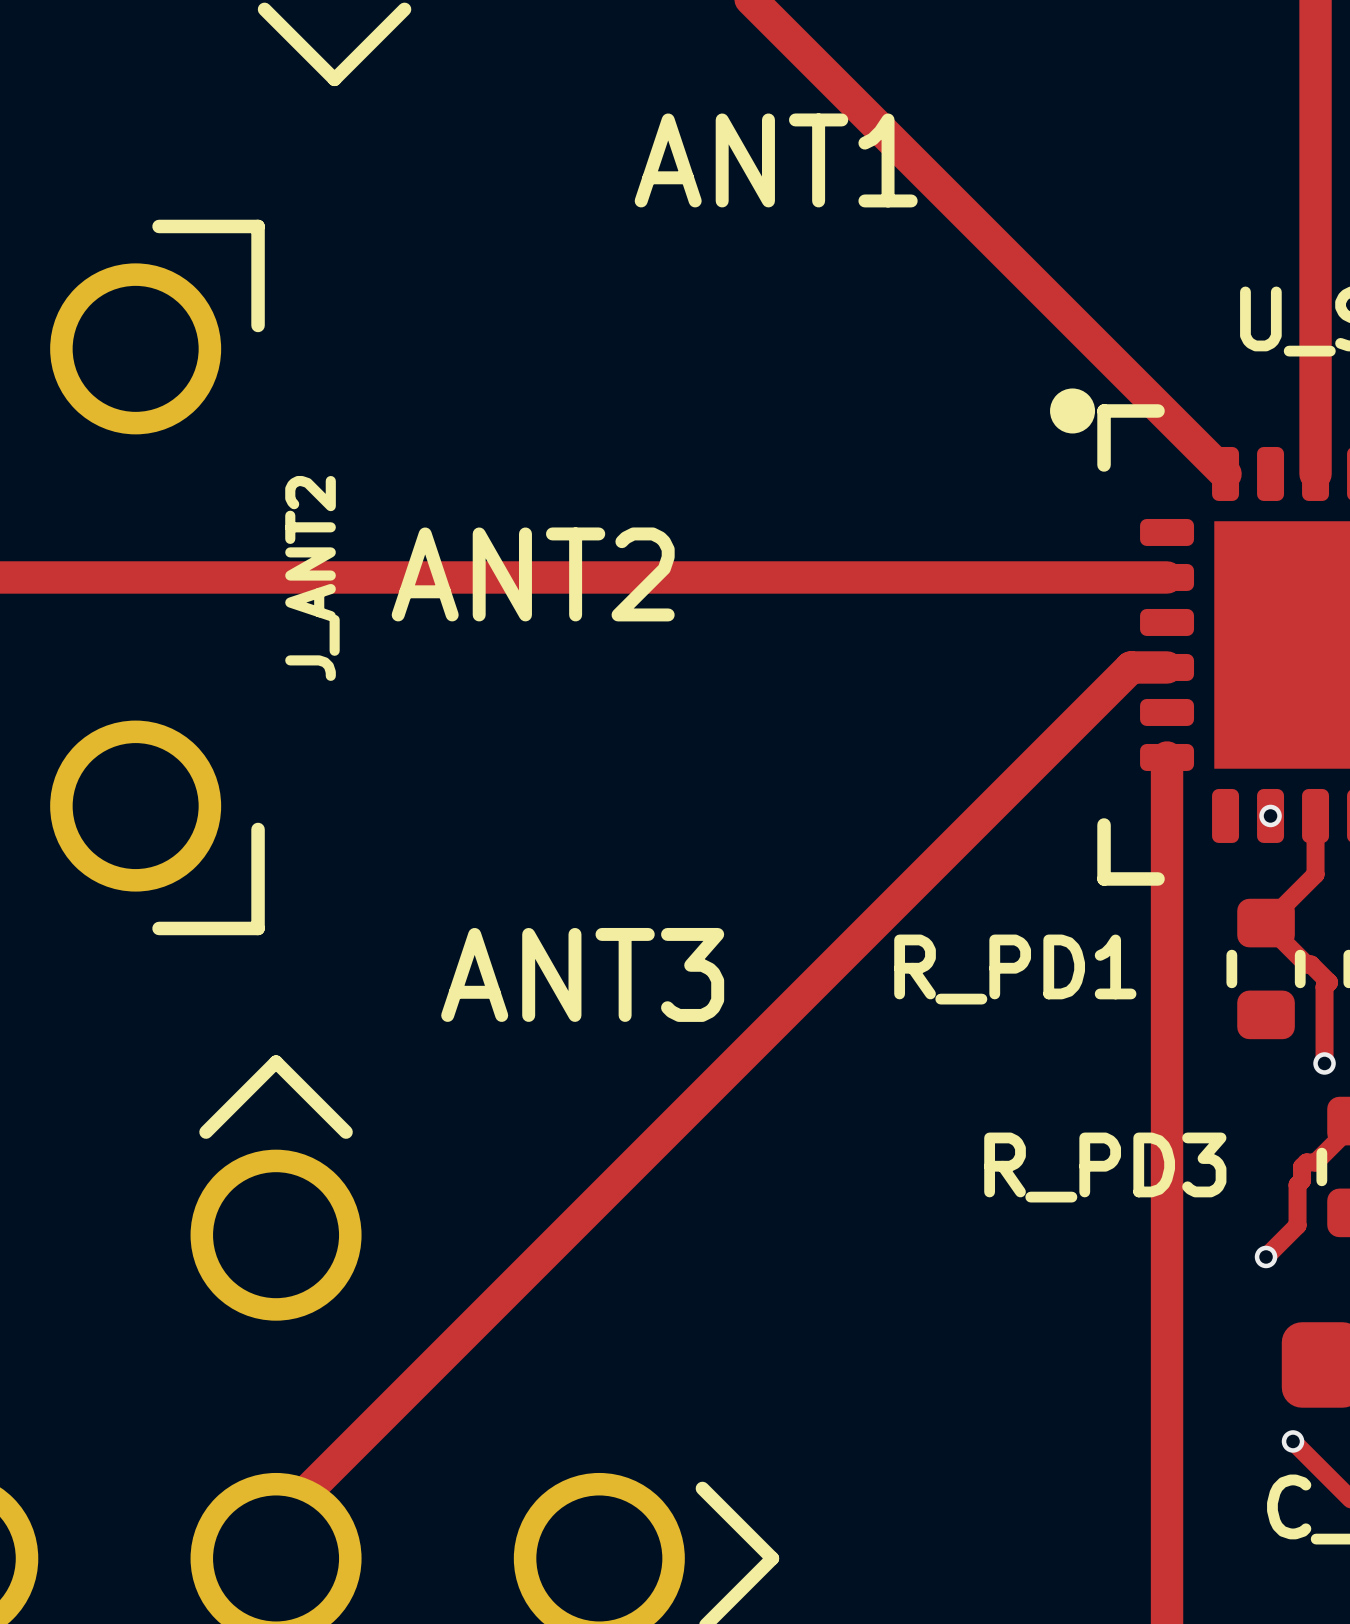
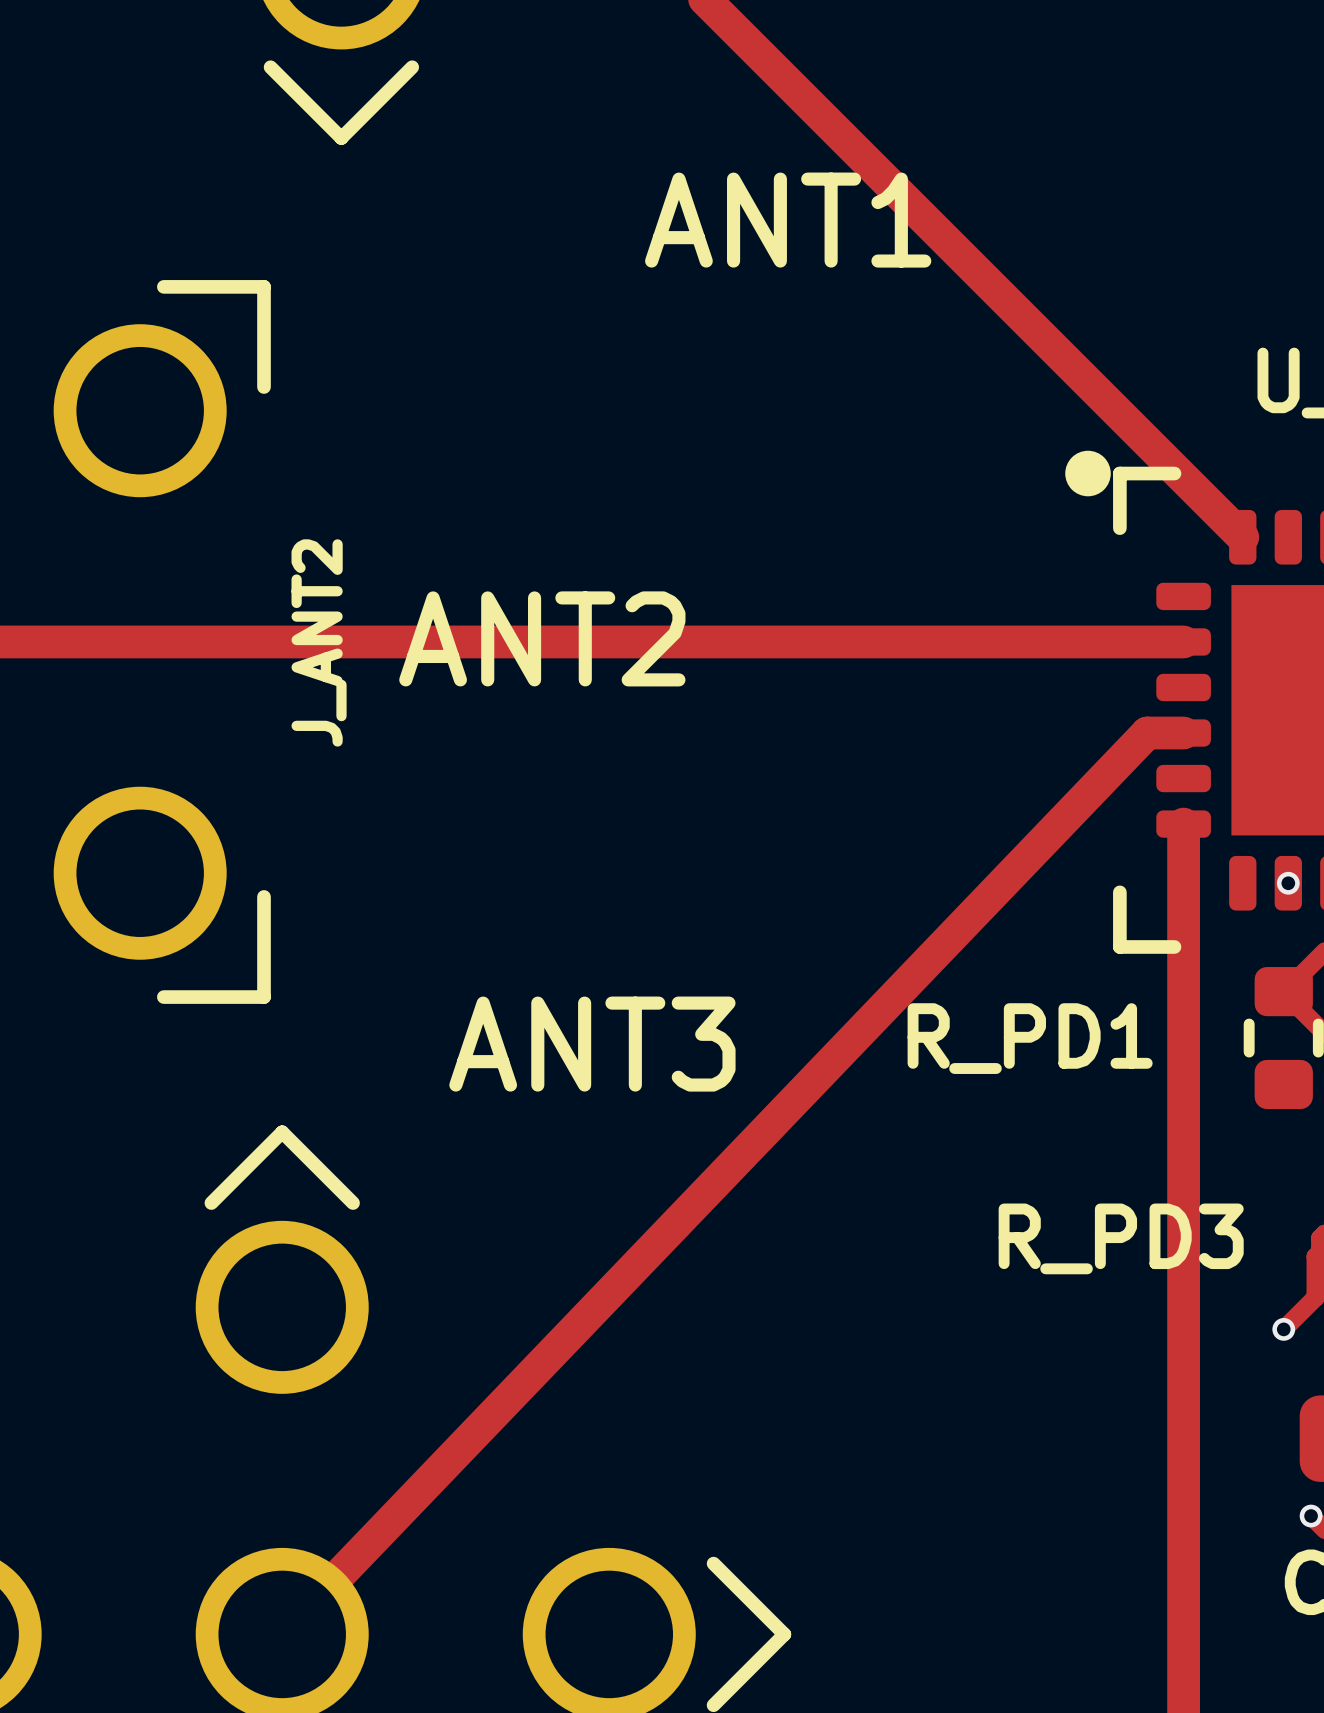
track: (1131, 667) (276, 1522) -> (1147, 733) (282, 1634)

